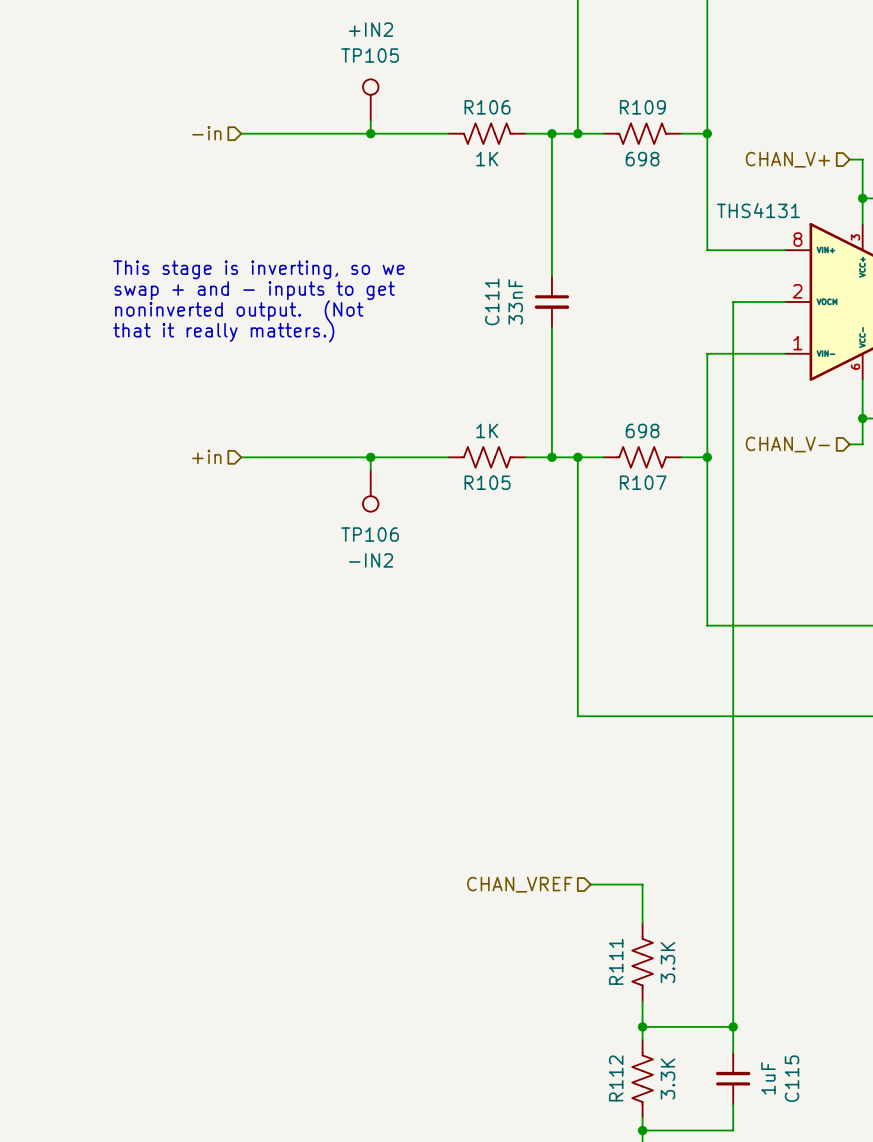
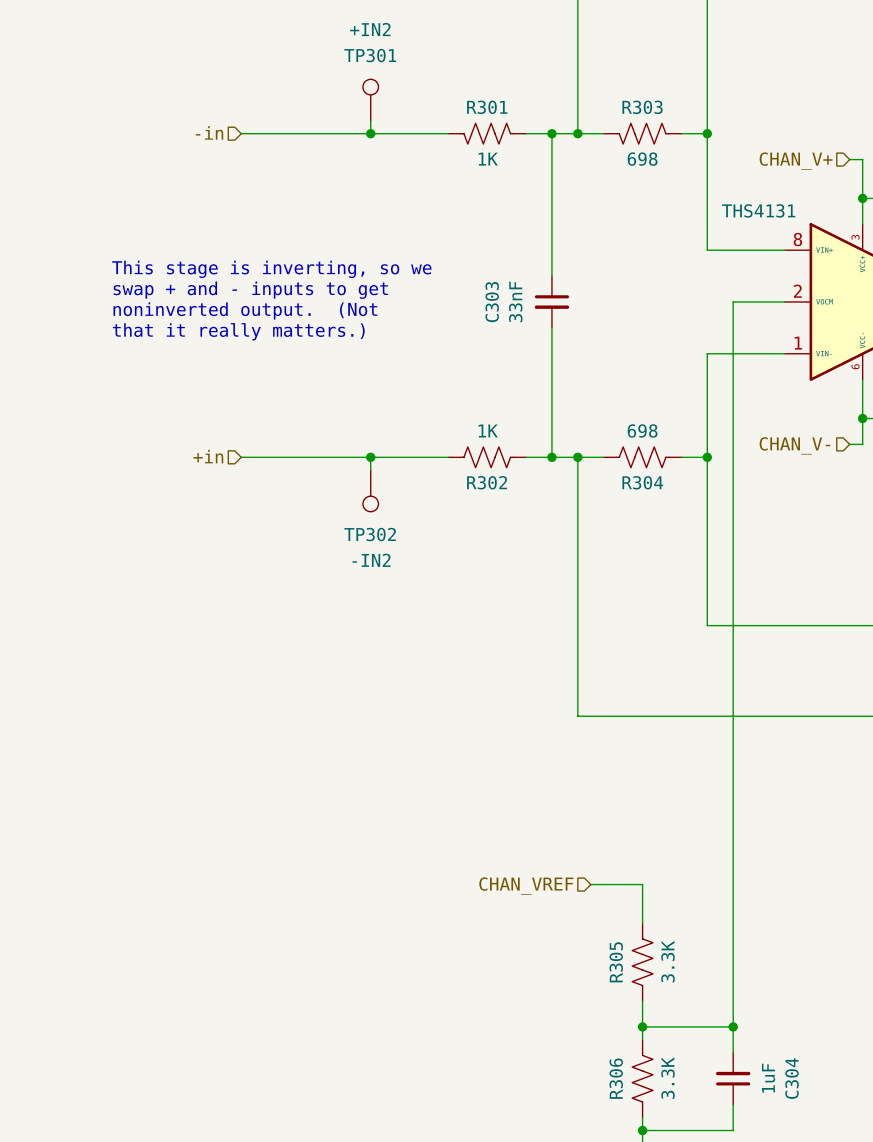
TP105 name: TP105 (370, 55) -> TP301 (370, 55)
R106 name: R106 (487, 107) -> R301 (487, 107)
R109 name: R109 (642, 107) -> R303 (642, 107)
C111 name: C111 (492, 301) -> C303 (492, 302)
R105 name: R105 (487, 482) -> R302 (487, 482)
R107 name: R107 (643, 482) -> R304 (642, 482)
TP106 name: TP106 (370, 534) -> TP302 (370, 534)
R111 name: R111 (616, 961) -> R305 (616, 962)
R112 name: R112 (616, 1078) -> R306 (616, 1078)
C115 name: C115 (792, 1078) -> C304 (792, 1078)

